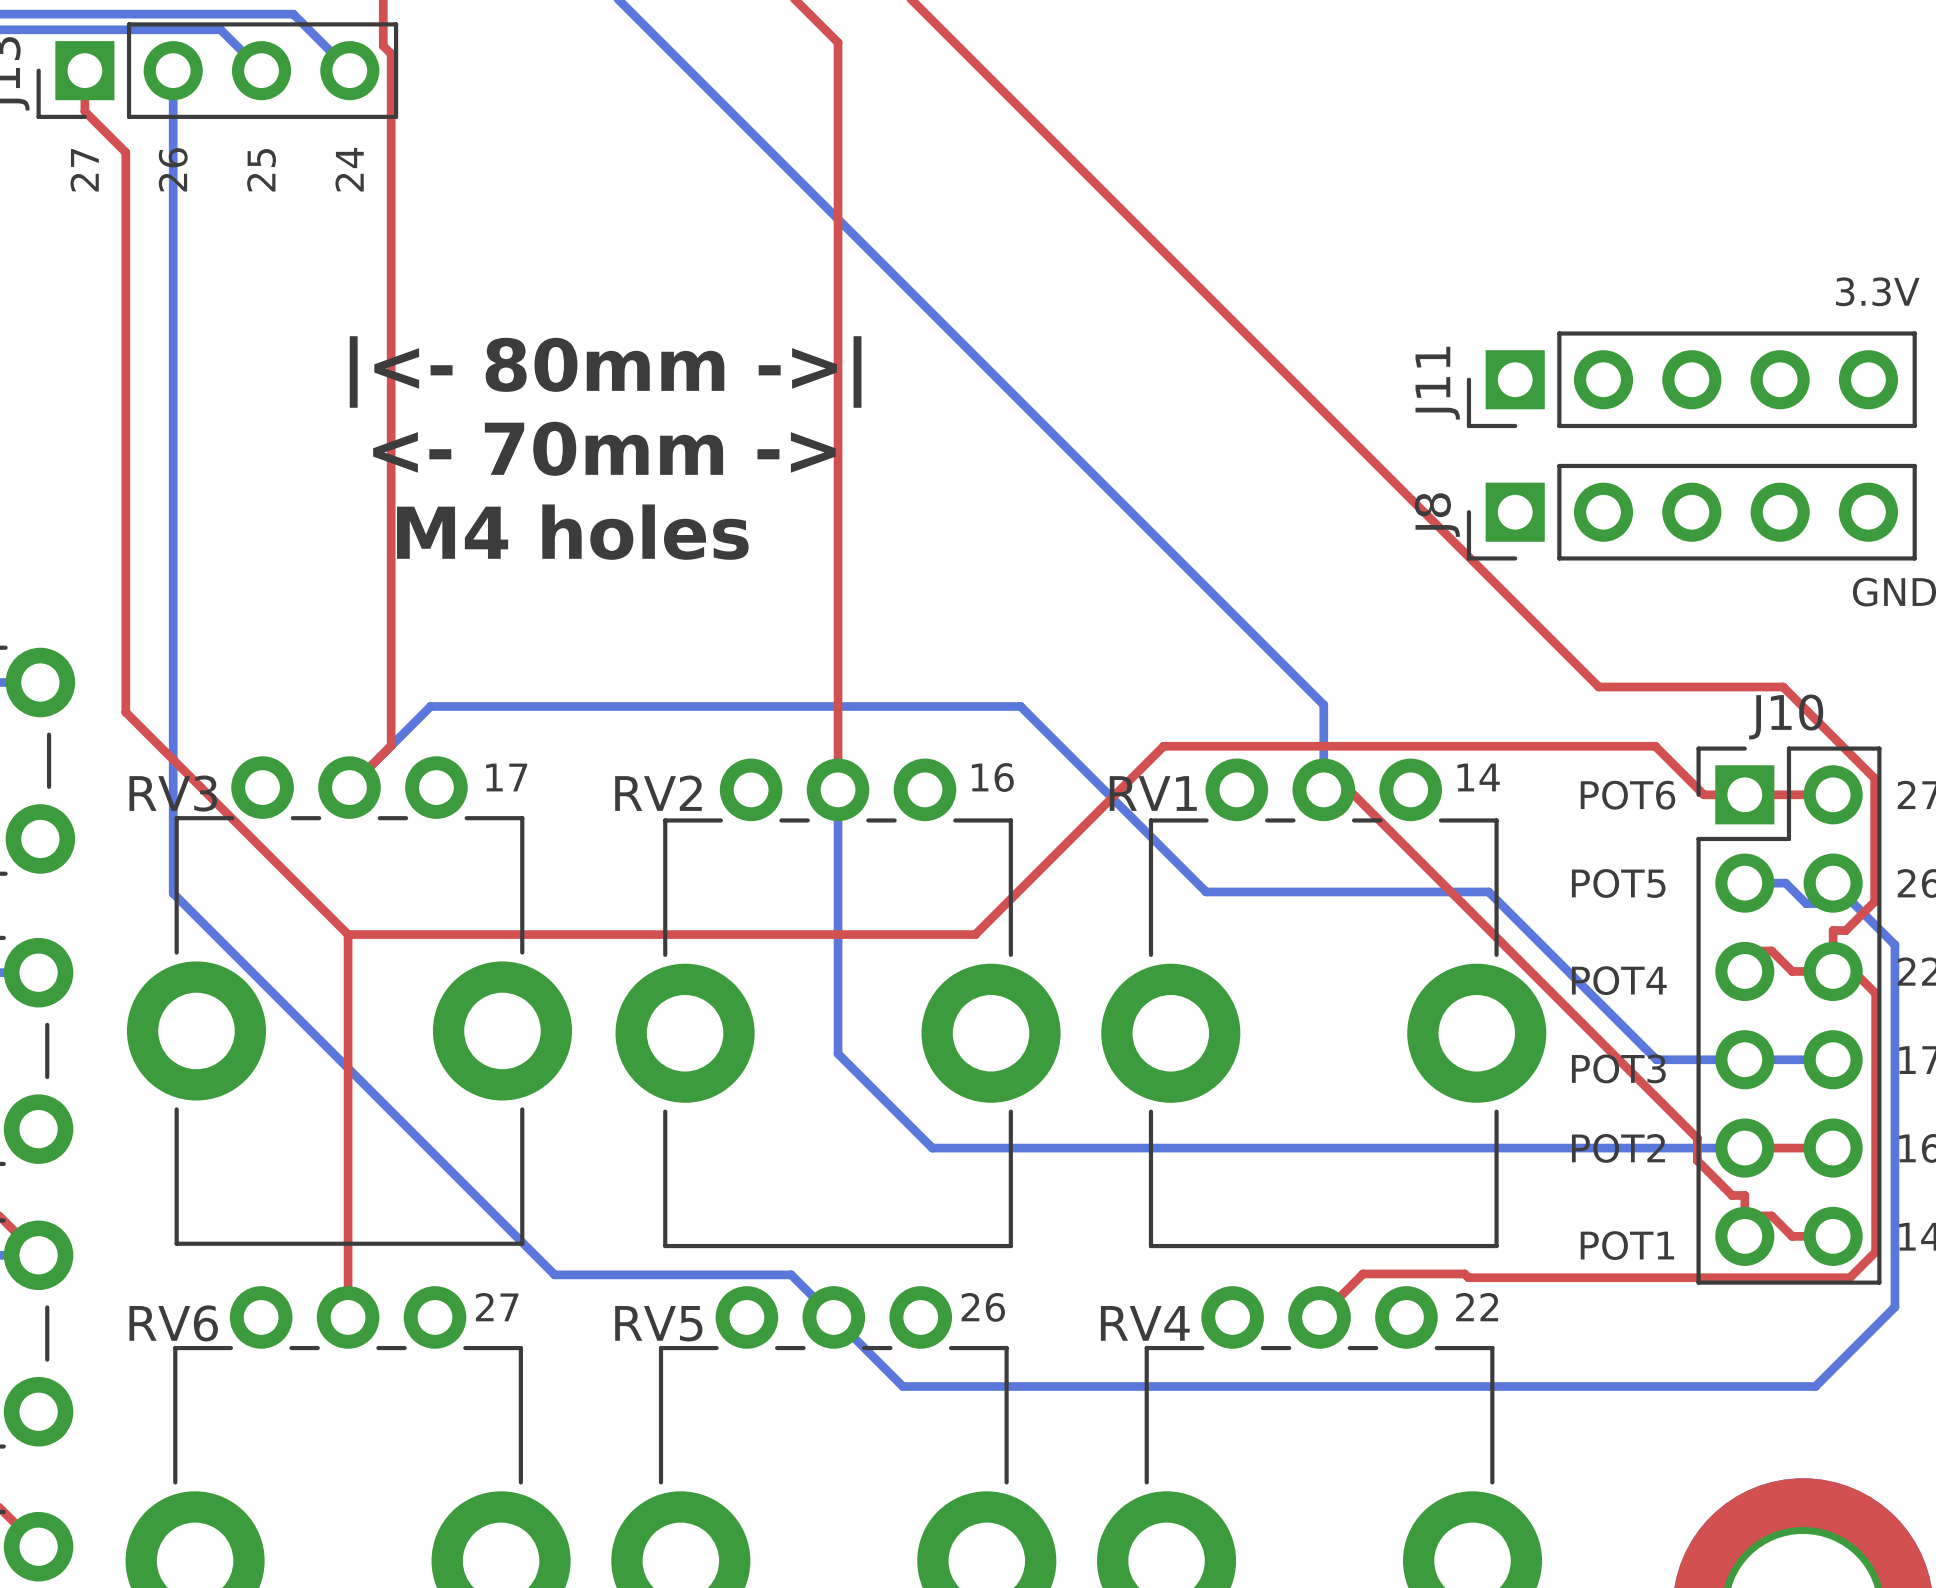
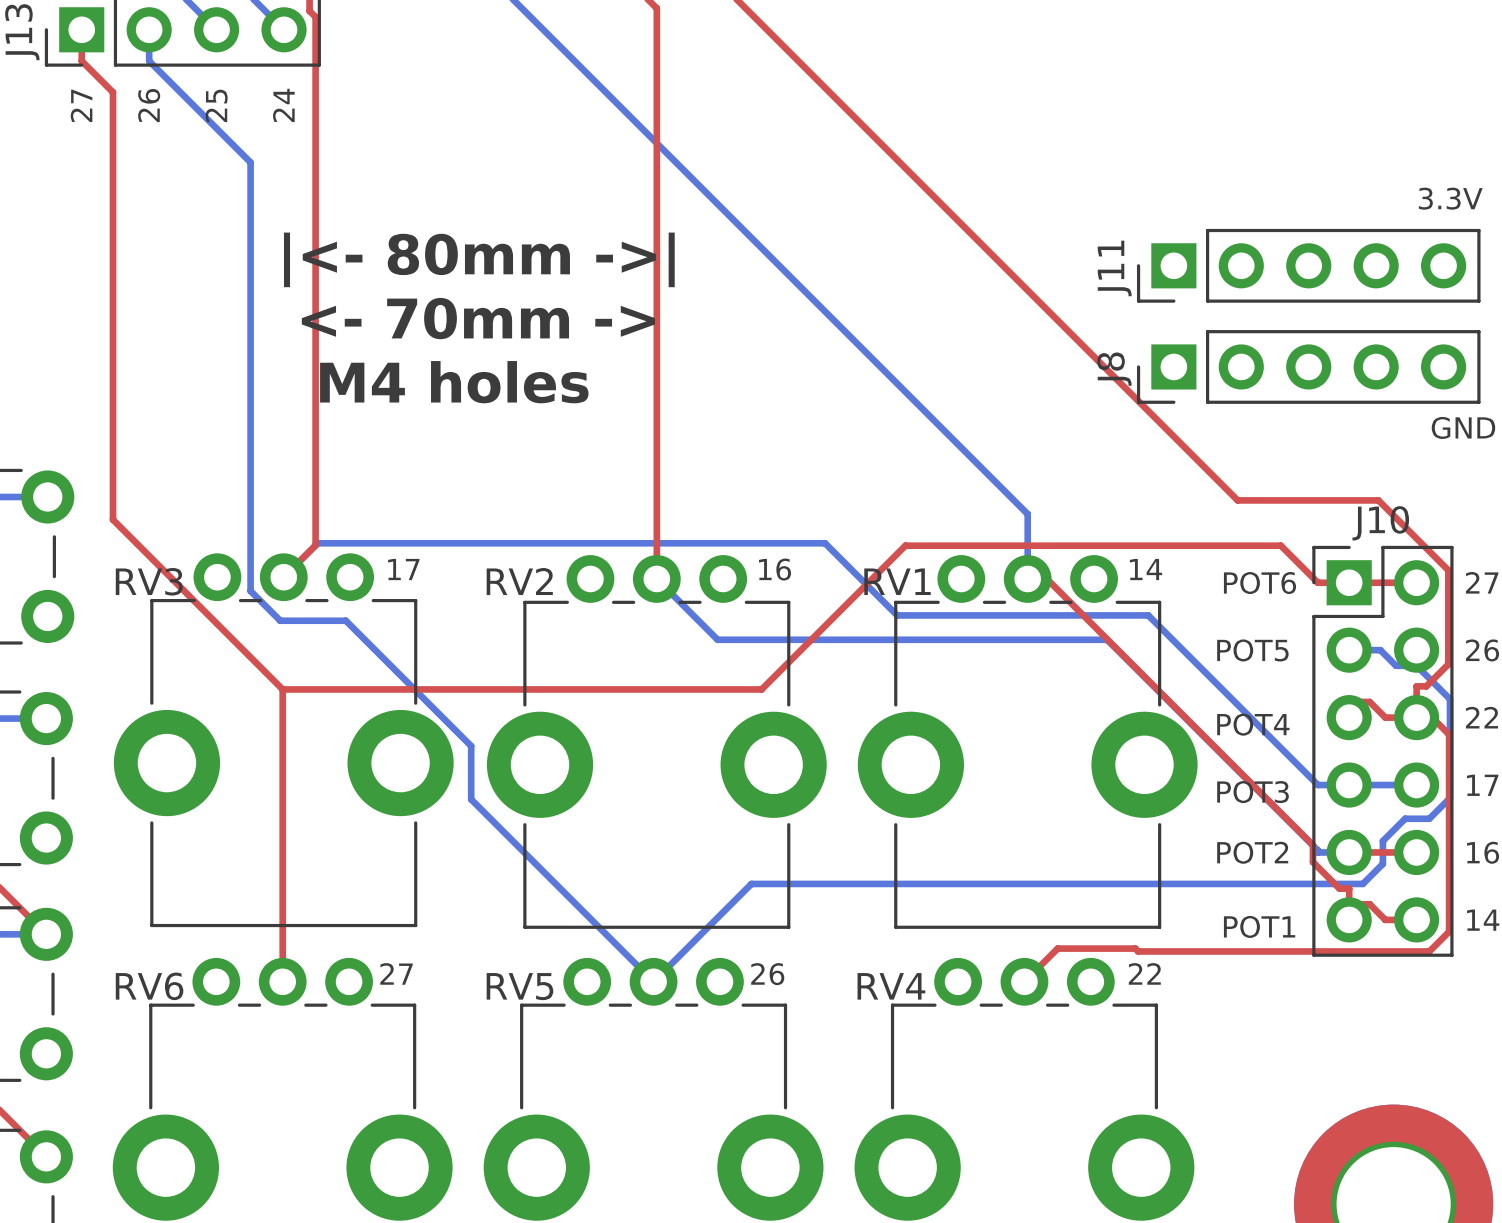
bottom track: (173, 111) (173, 893) (554, 1274) (791, 1274) -> (149, 61) (250, 162) (250, 591) (280, 620) (345, 620) (471, 746) (471, 799) (621, 949)
bottom track: (393, 743) (430, 706) (1020, 706) (1206, 891) (1488, 891) (1656, 1059) (1703, 1059) -> (317, 543) (825, 543) (897, 615) (1148, 615) (1317, 785)
bottom track: (838, 789) (838, 1053) (932, 1148) (1703, 1148) -> (656, 578) (717, 639) (1107, 639) (1317, 852)
bottom track: (1833, 883) (1894, 944) (1894, 1307) (1815, 1386) (902, 1386) (833, 1317) -> (1416, 665) (1449, 699) (1449, 798) (1429, 818) (1405, 818) (1382, 841) (1382, 863) (1362, 883) (751, 883) (653, 981)

